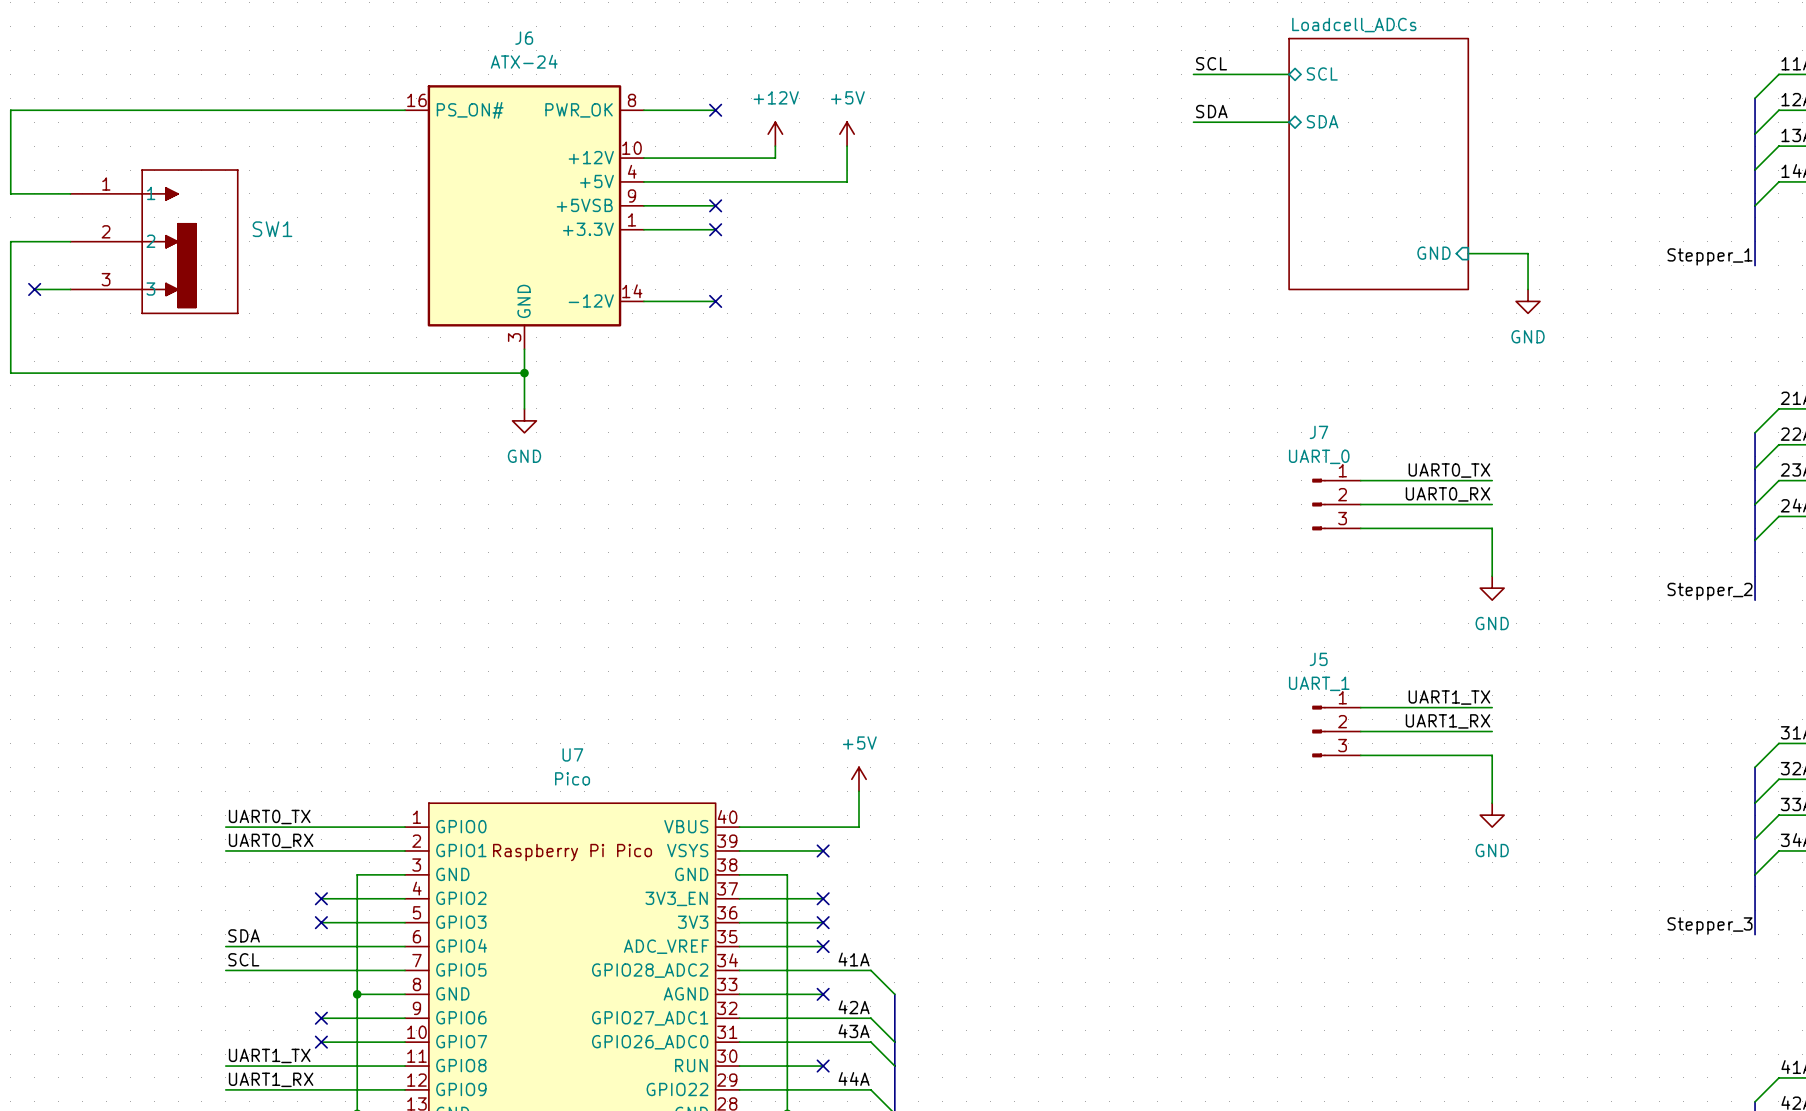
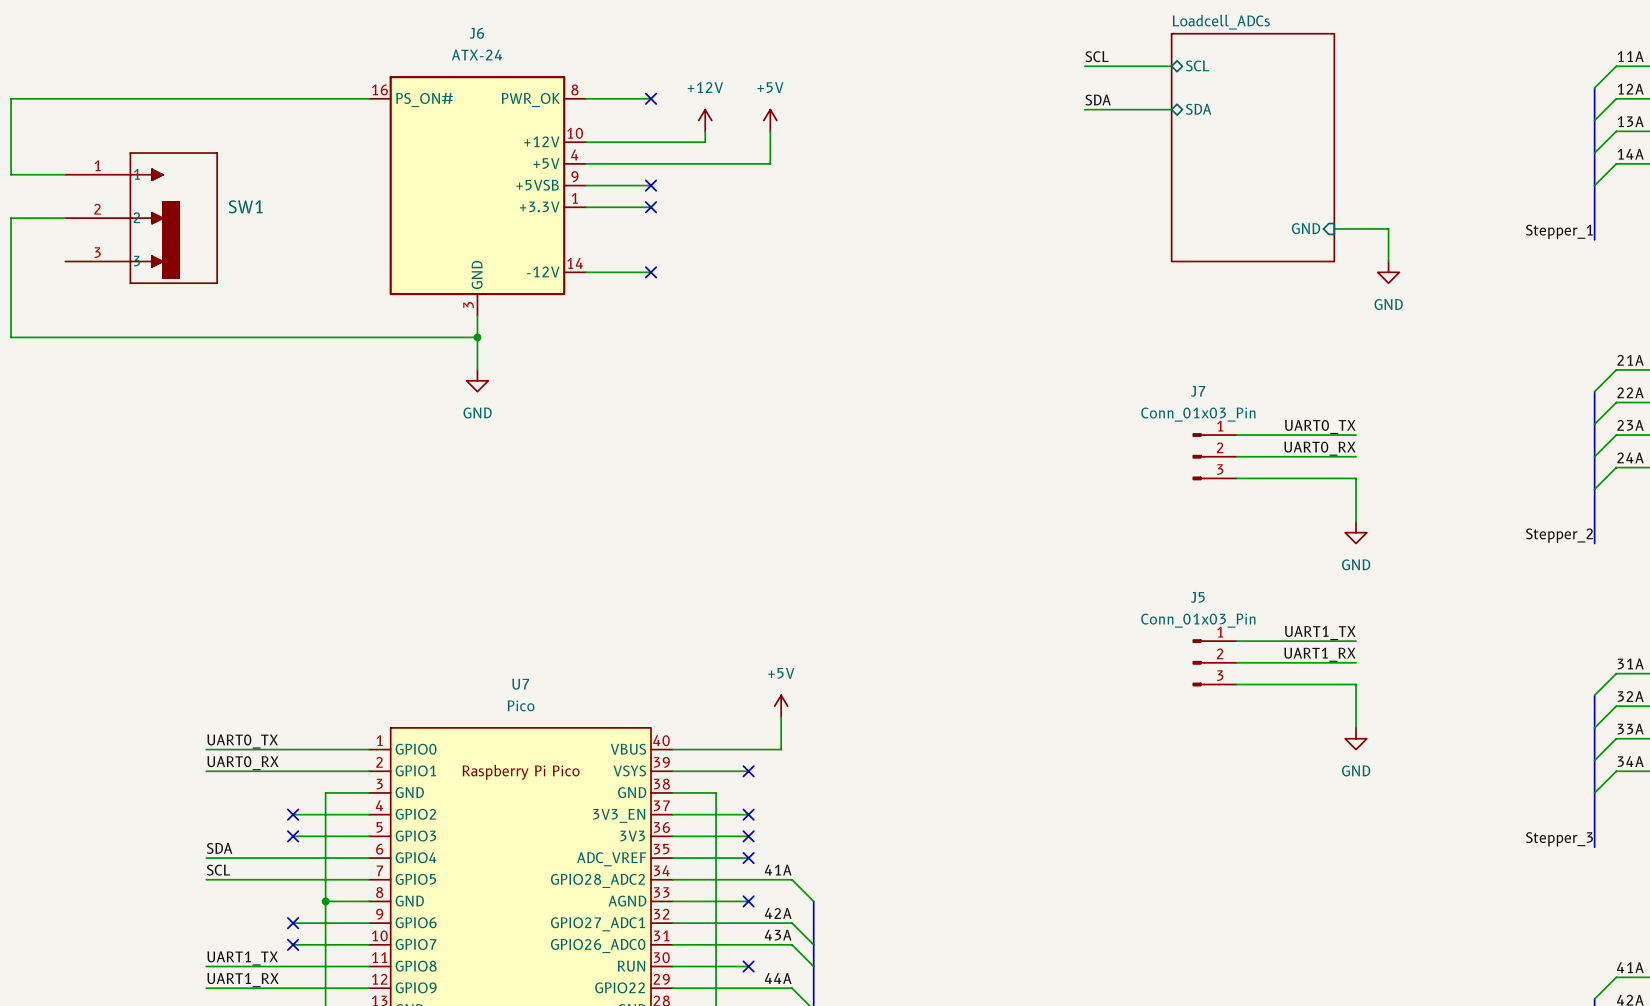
wire: (34, 289) (70, 289) -> none
no-connect mark: (34, 289) -> none
J7 value: UART_0 (1319, 456) -> Conn_01x03_Pin (1198, 414)
J5 value: UART_1 (1319, 683) -> Conn_01x03_Pin (1198, 620)

